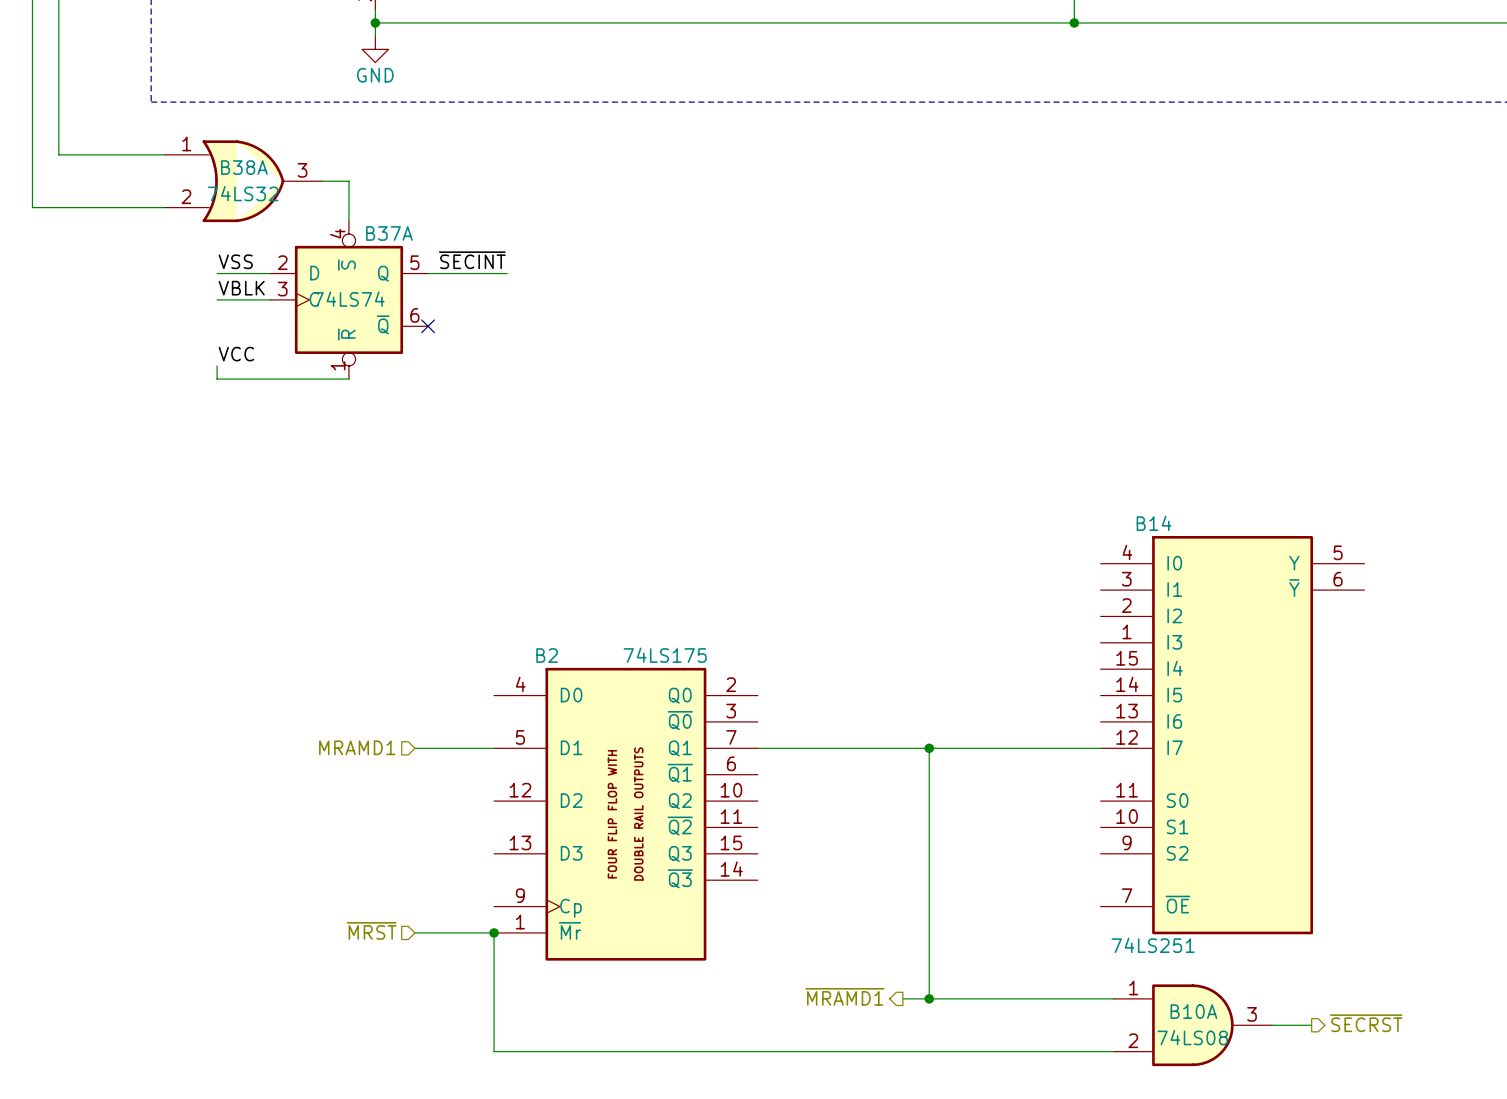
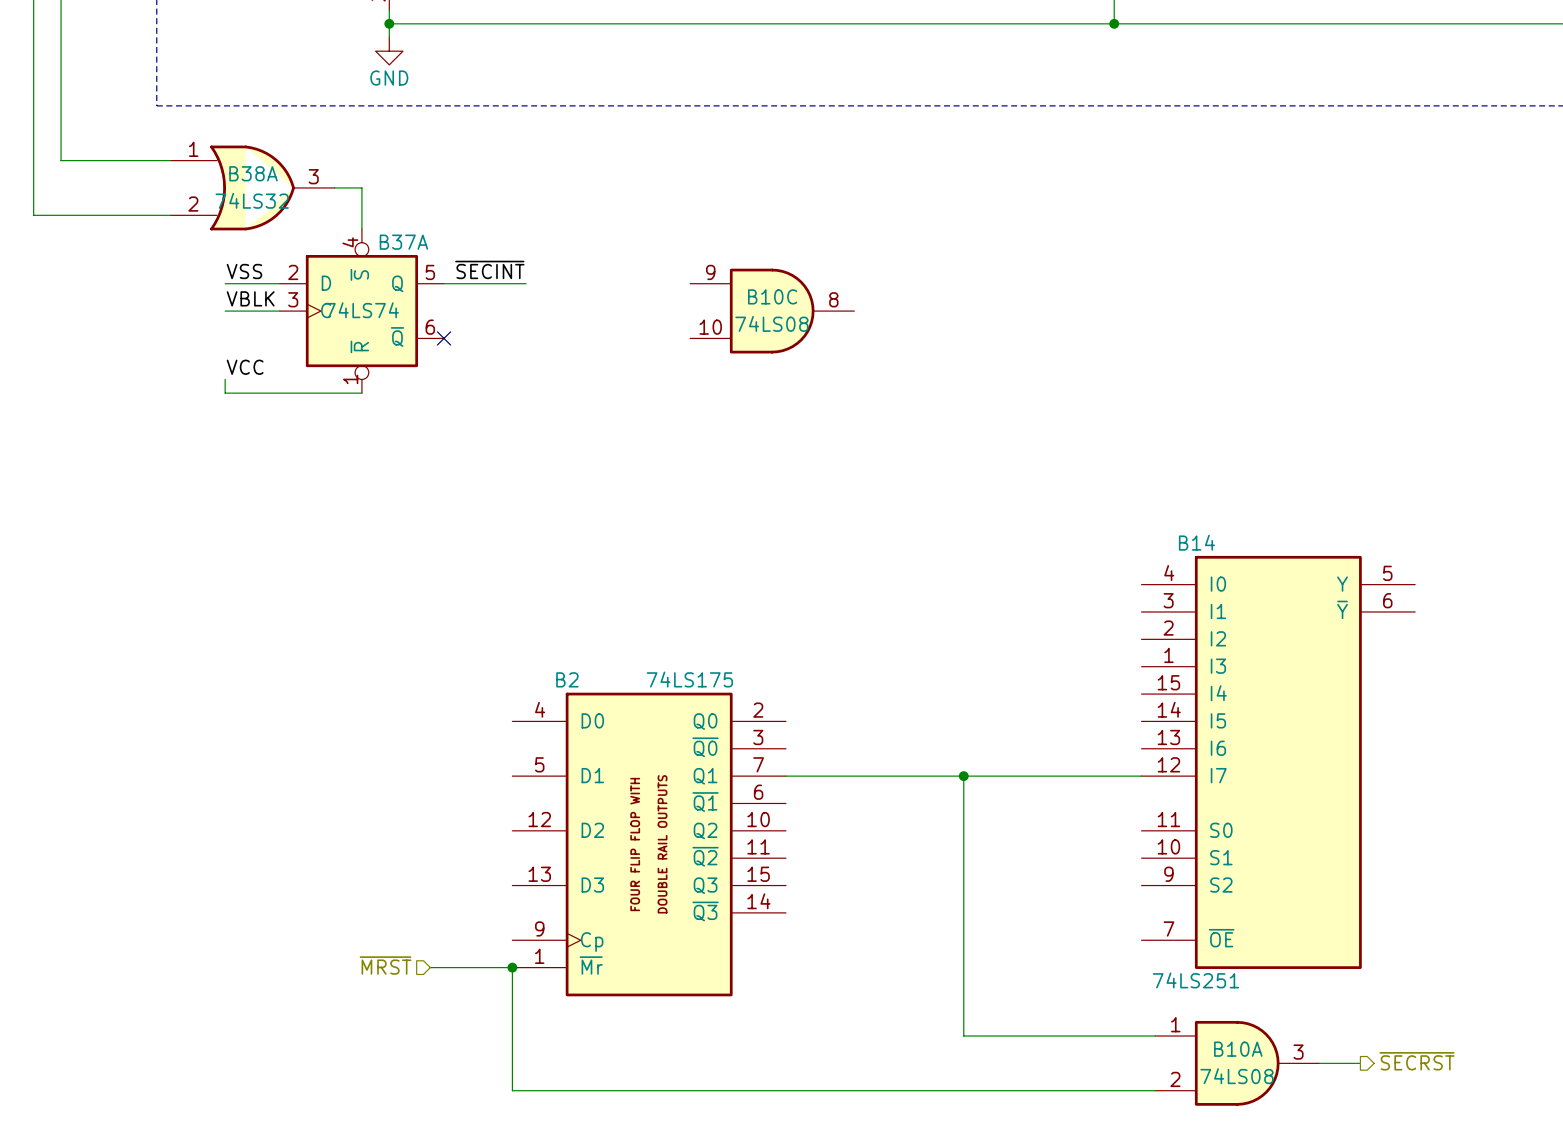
B10C: none -> 74LS08 (772, 311)
hierarchical label: MRAMD1 (357, 747) -> none
wire: (414, 748) (494, 748) -> none
hierarchical label: ~{MRAMD1} (844, 996) -> none
wire: (902, 998) (929, 998) -> none
junction: (929, 998) -> none

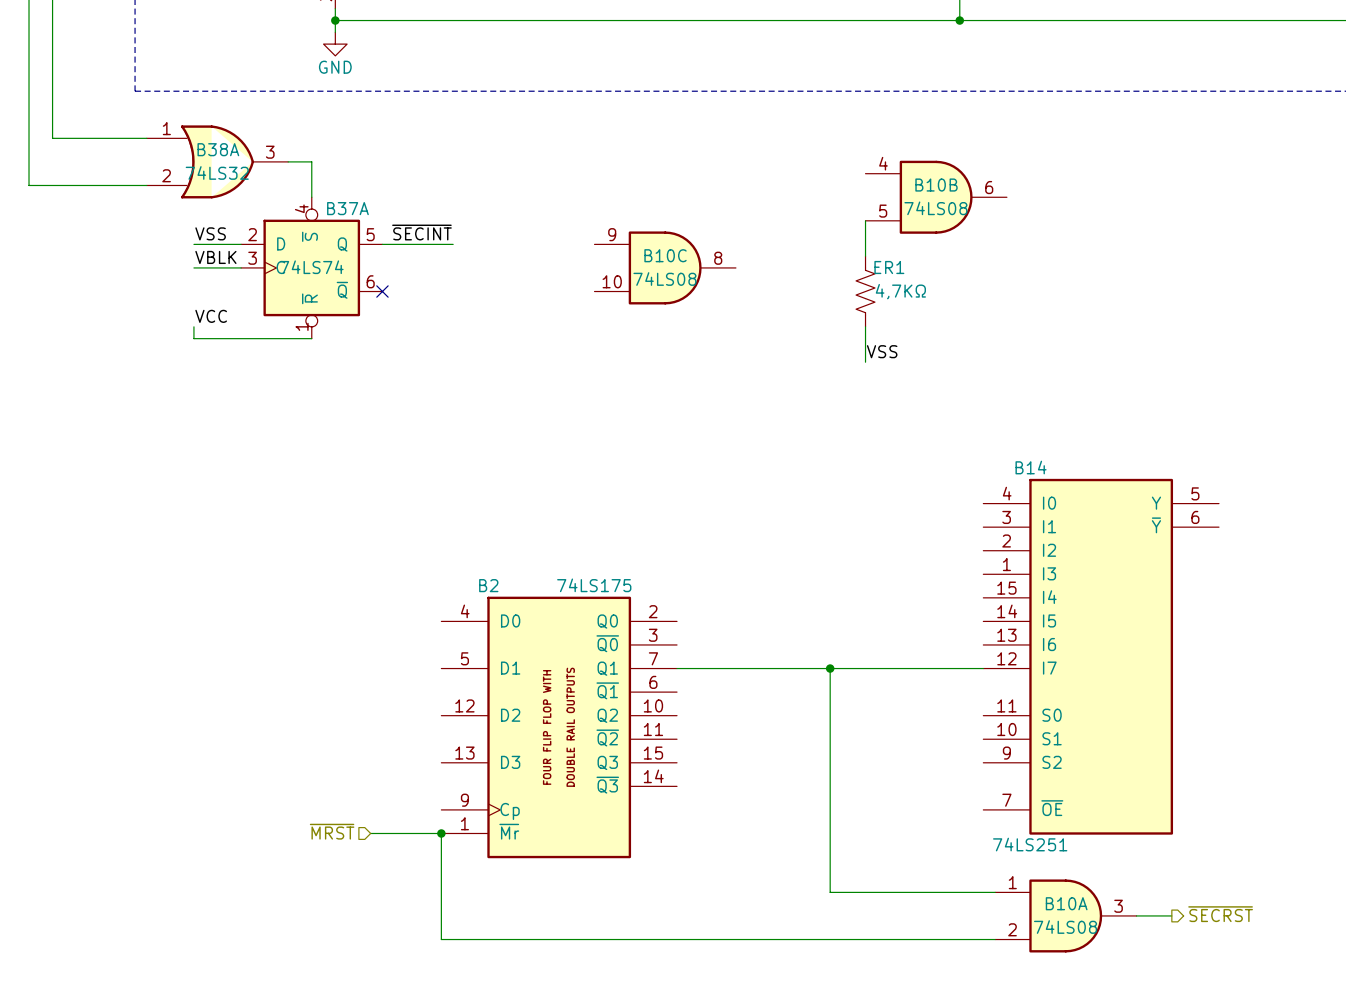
B10B: none -> 74LS08 (936, 197)
wire: none -> (865, 220) (865, 256)
ER1: none -> 4,7KΩ (865, 291)
wire: none -> (865, 326) (865, 362)
label: none -> VSS (882, 351)

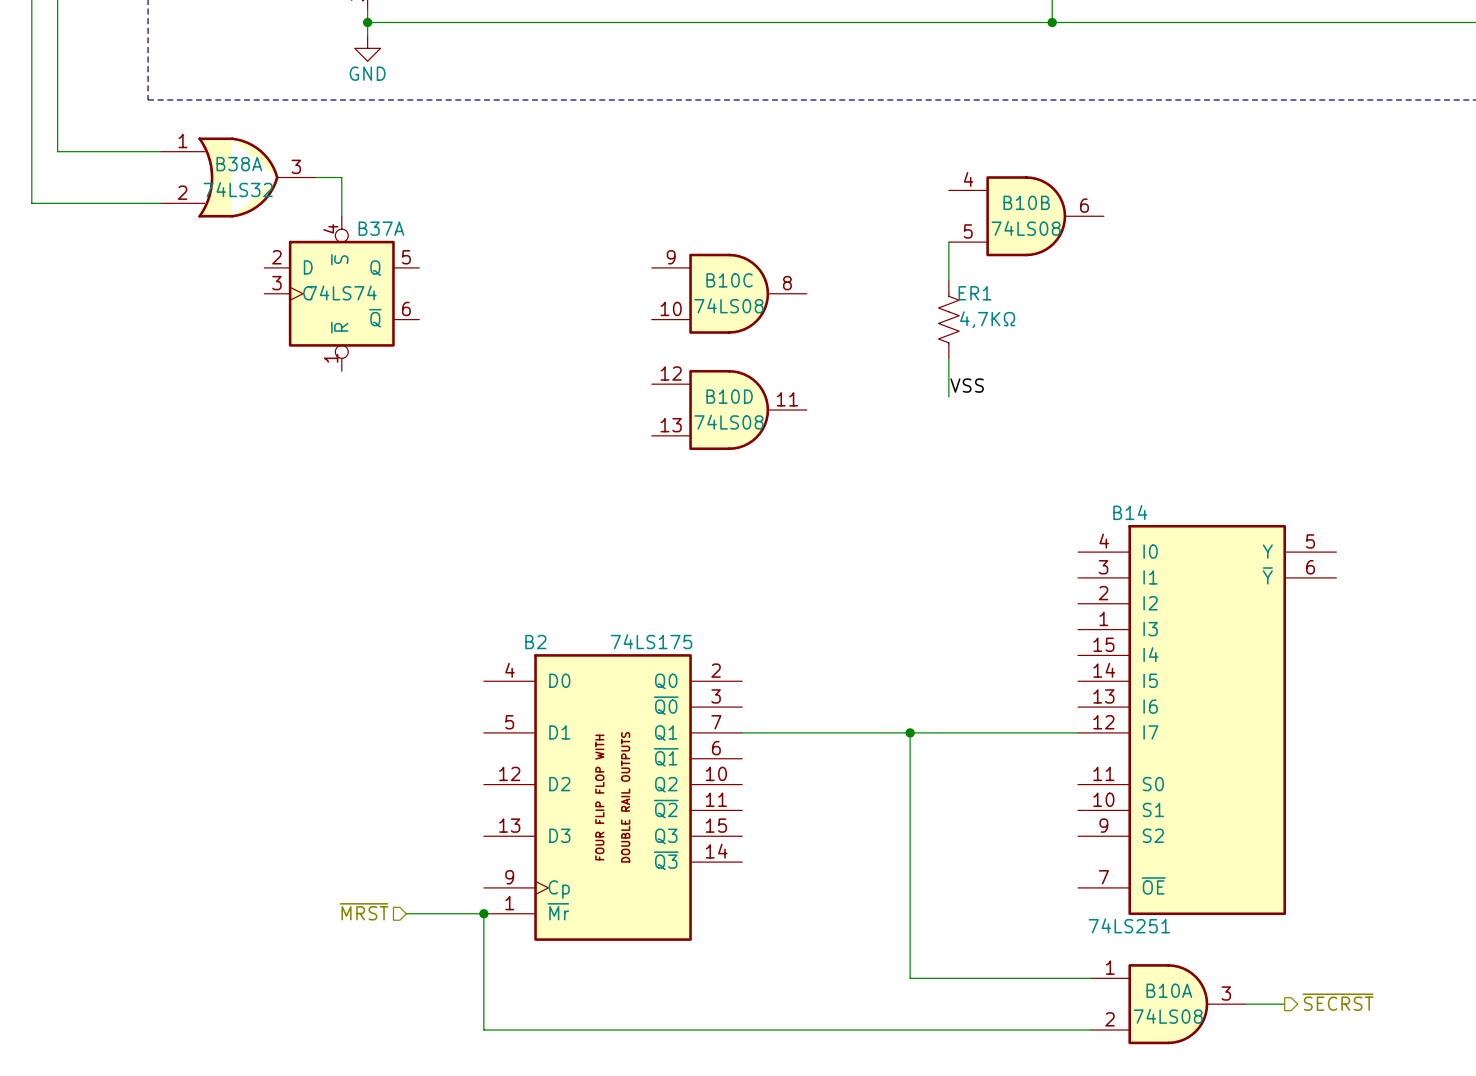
label: ~{SECINT} (421, 232) -> none
label: VSS (210, 233) -> none
wire: (193, 244) (241, 244) -> none
wire: (382, 244) (453, 244) -> none
label: VBLK (215, 257) -> none
wire: (193, 267) (241, 267) -> none
no-connect mark: (382, 291) -> none
label: VCC (211, 316) -> none
wire: (193, 326) (193, 338) (311, 338) -> none
B10D: none -> 74LS08 (729, 410)

